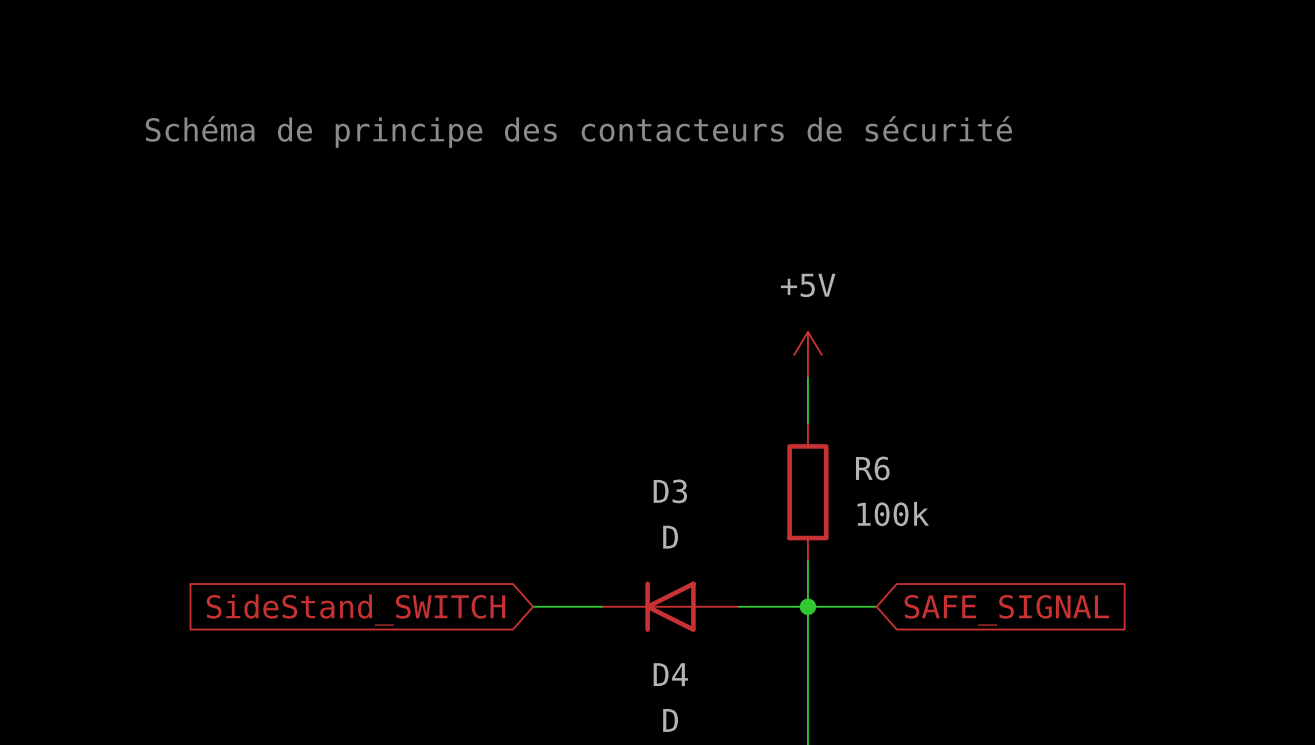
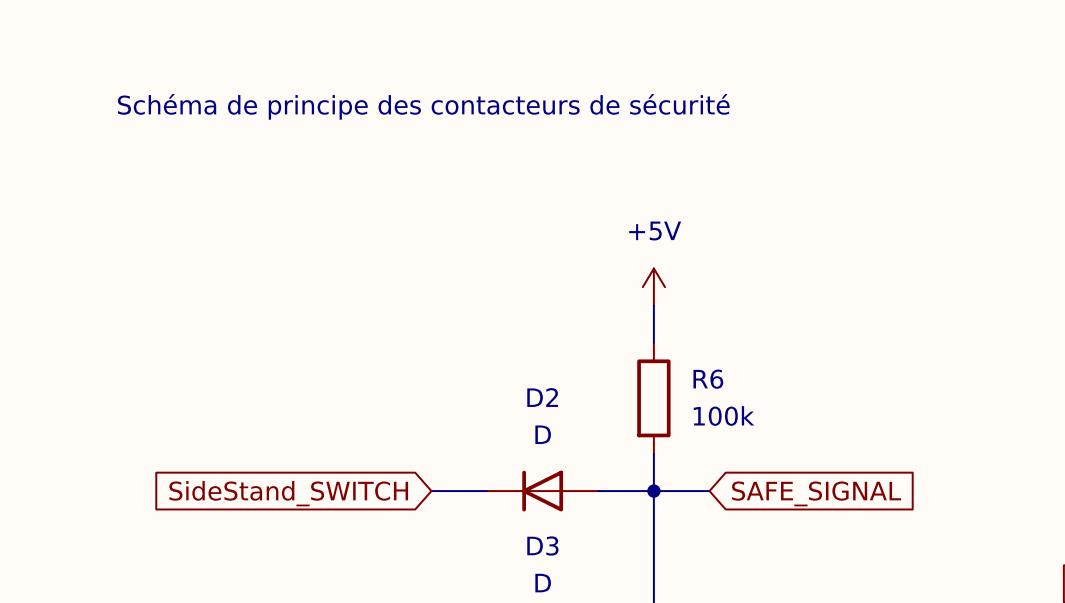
D3 name: D3 (670, 491) -> D2 (542, 397)
D4 name: D4 (670, 674) -> D3 (542, 546)

